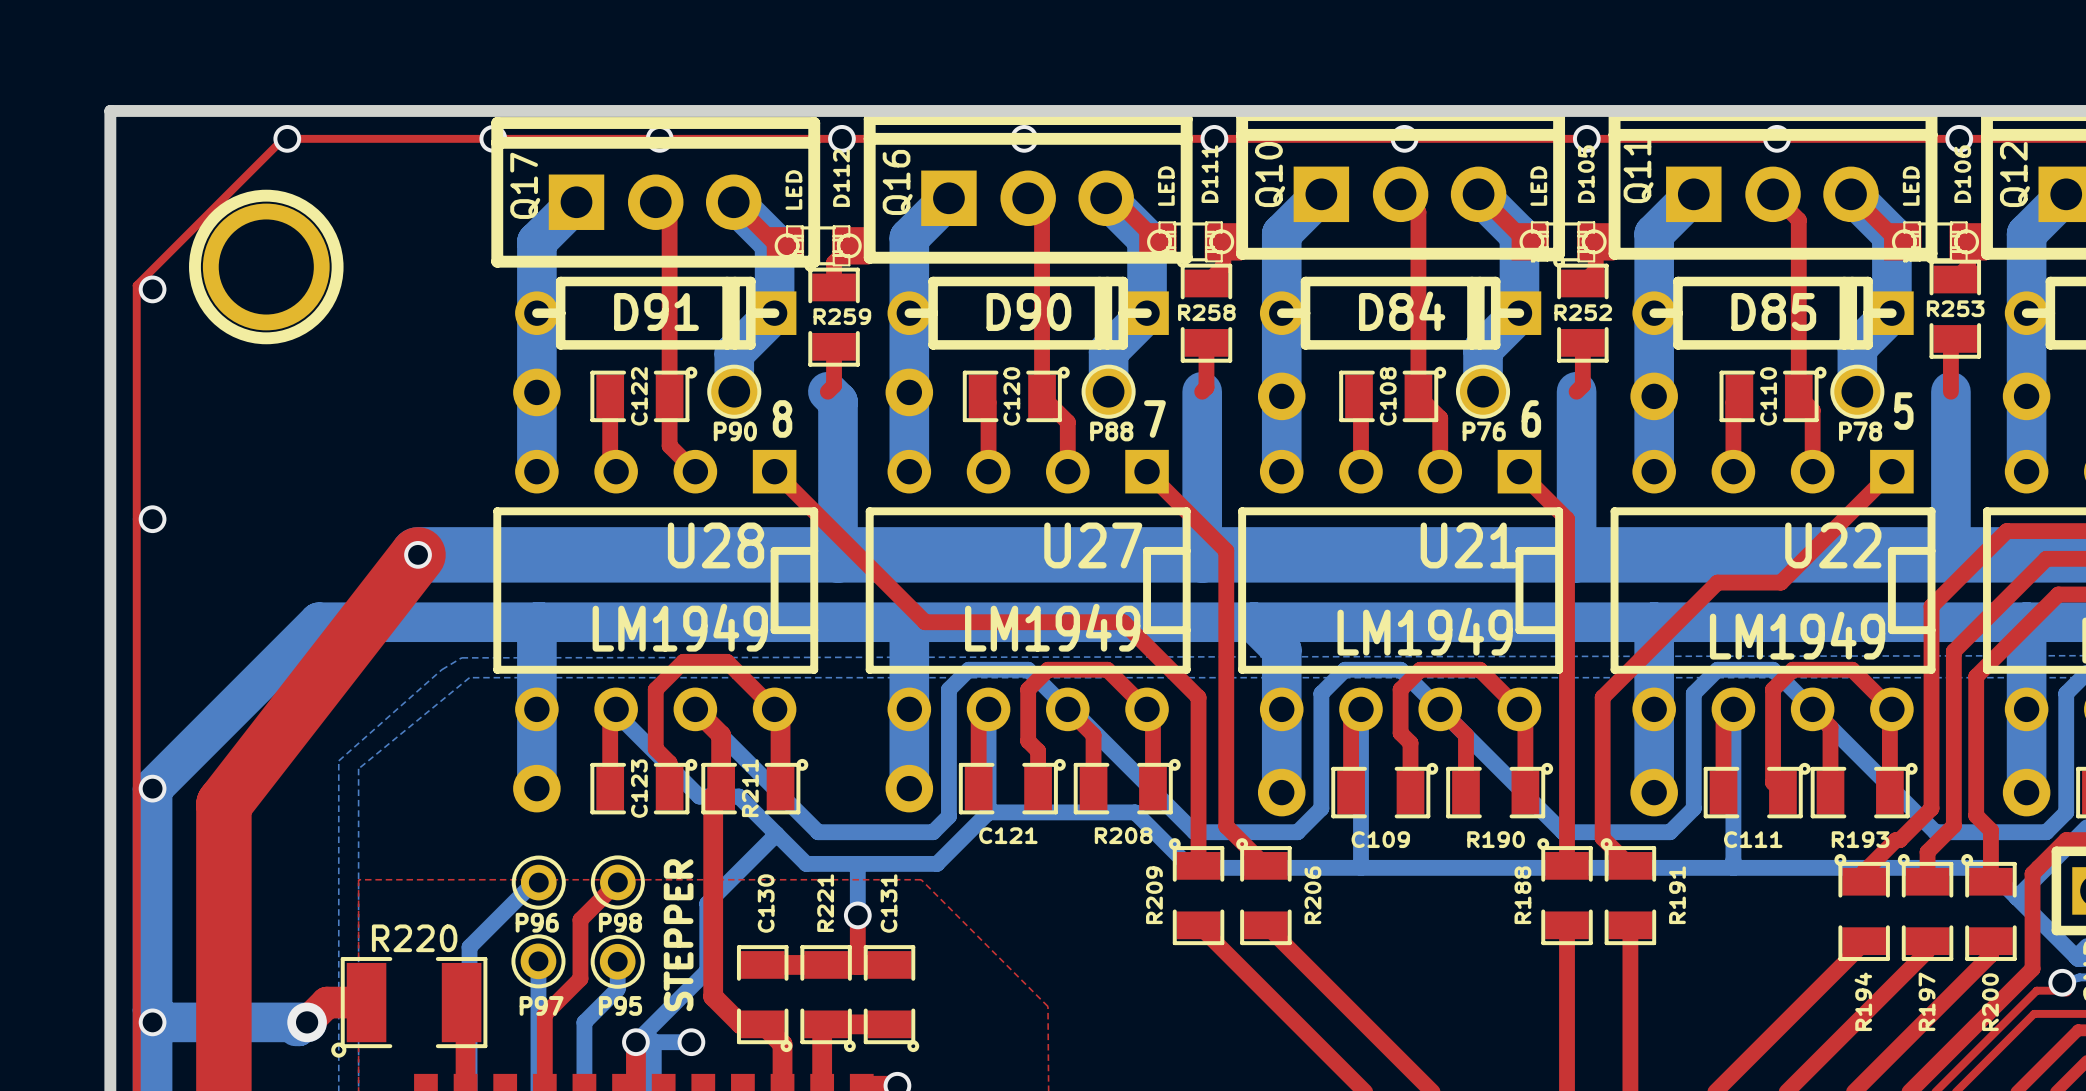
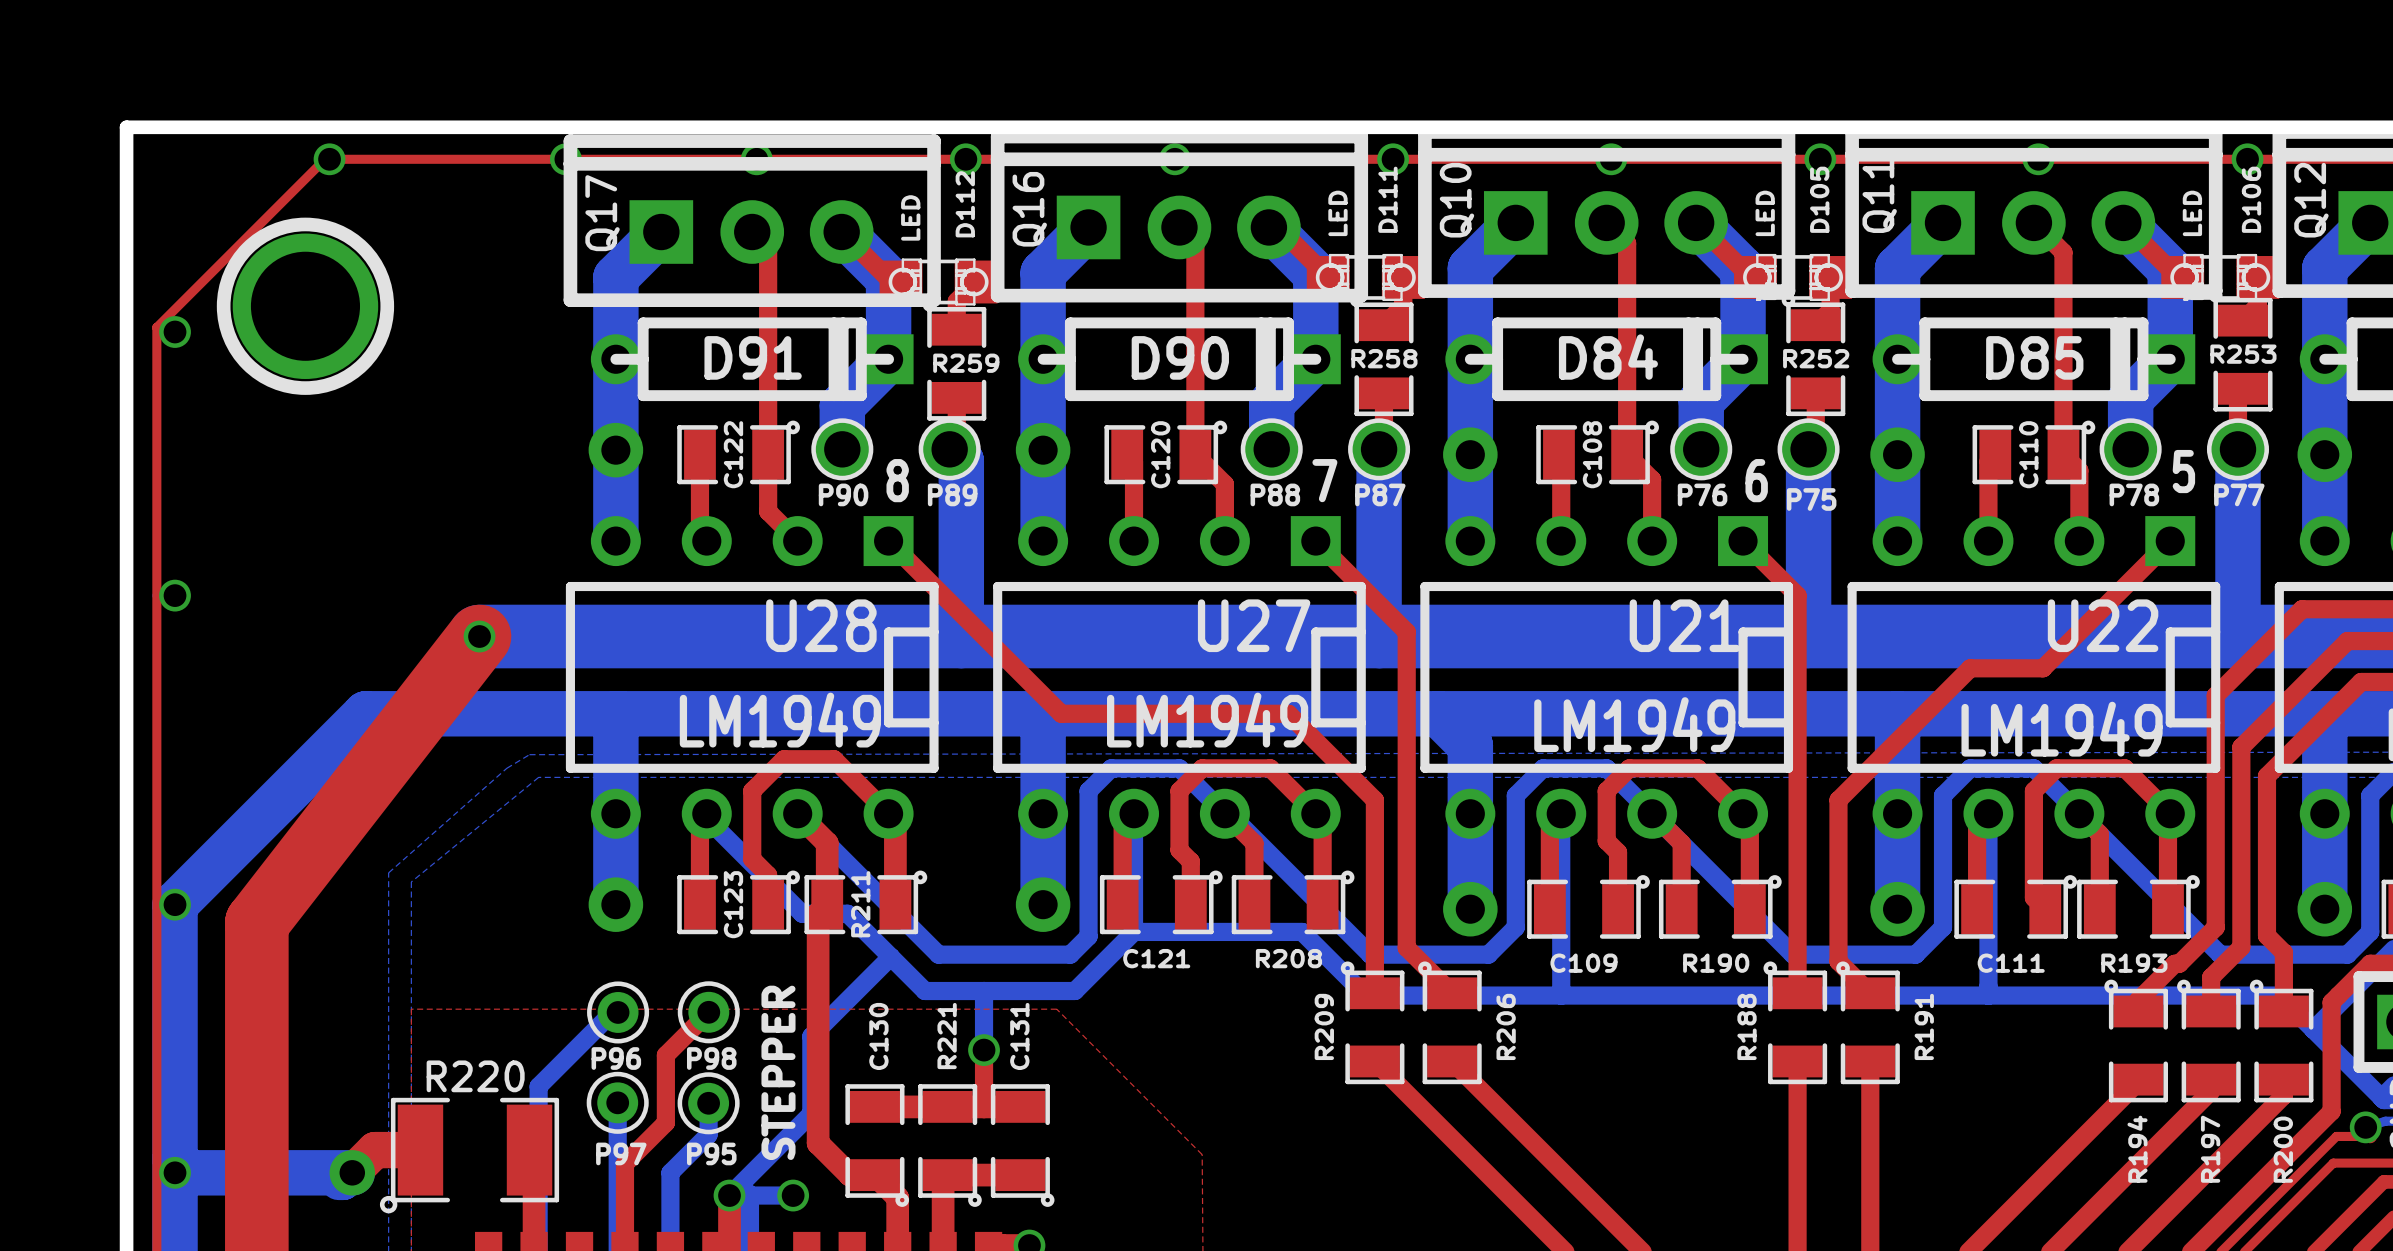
P89: none -> (949, 449)
P87: none -> (1379, 449)
P75: none -> (1808, 449)
P77: none -> (2237, 449)

